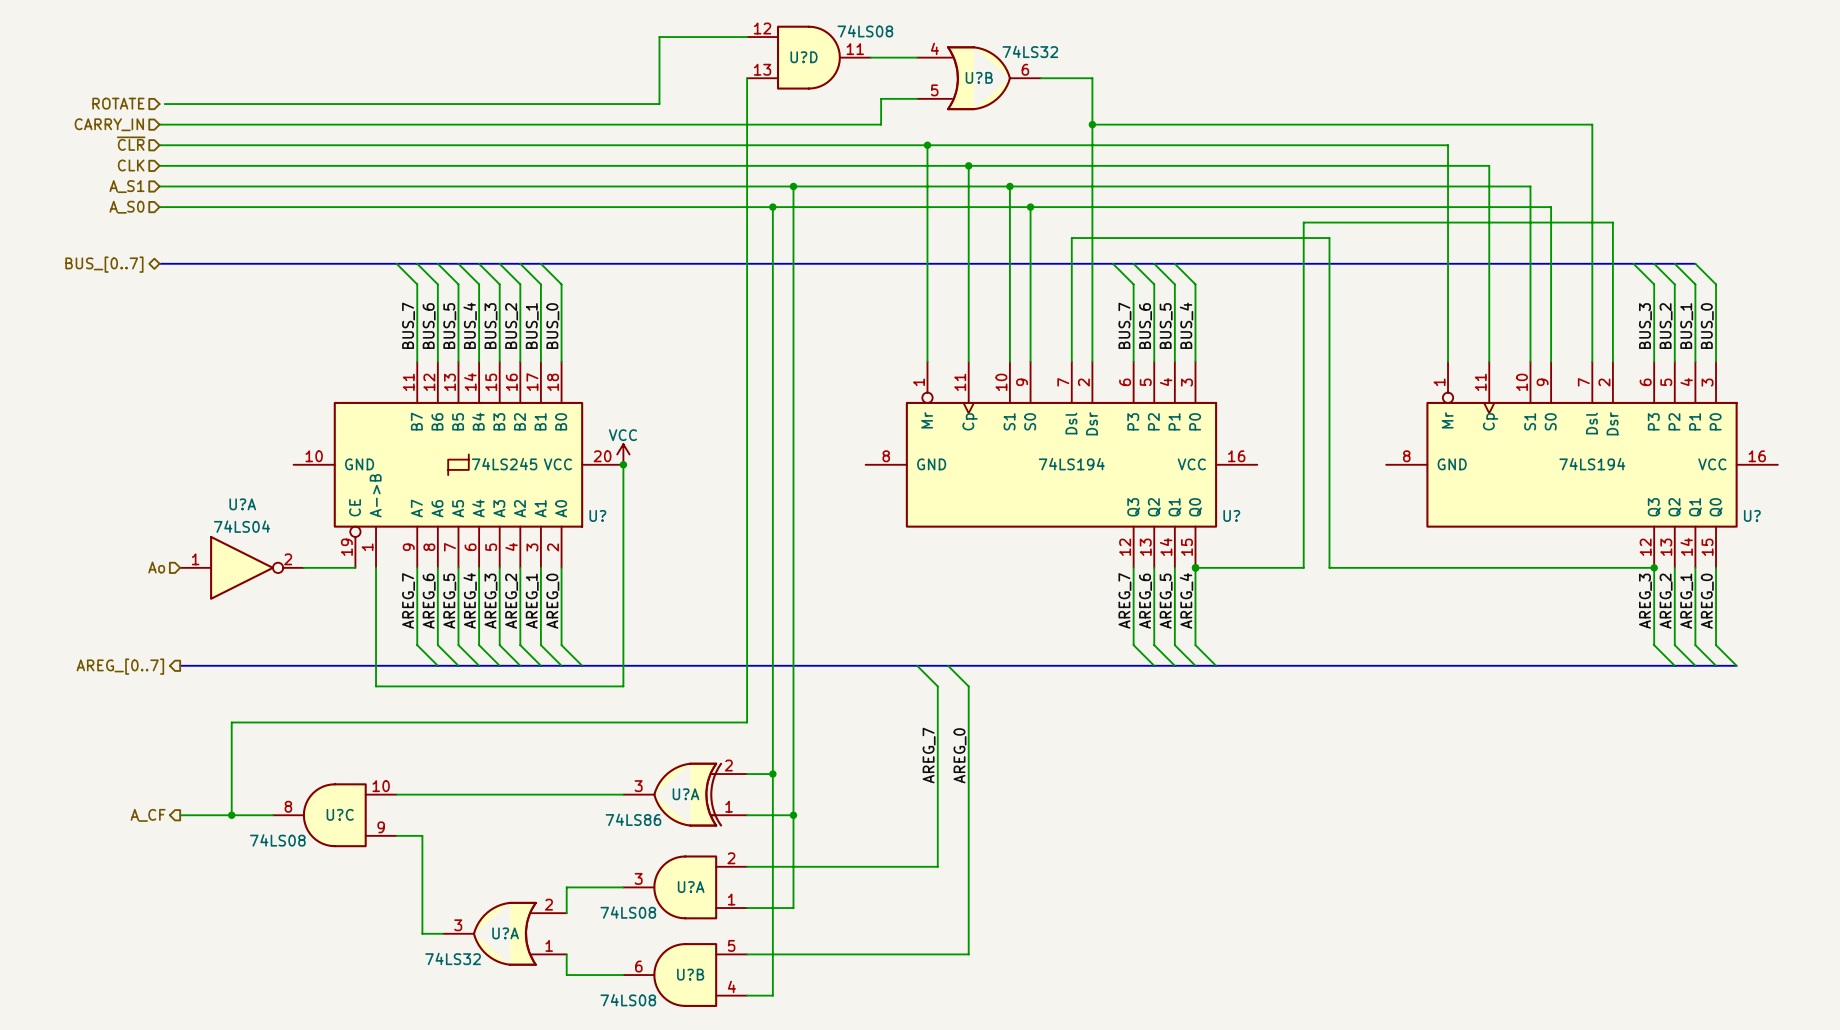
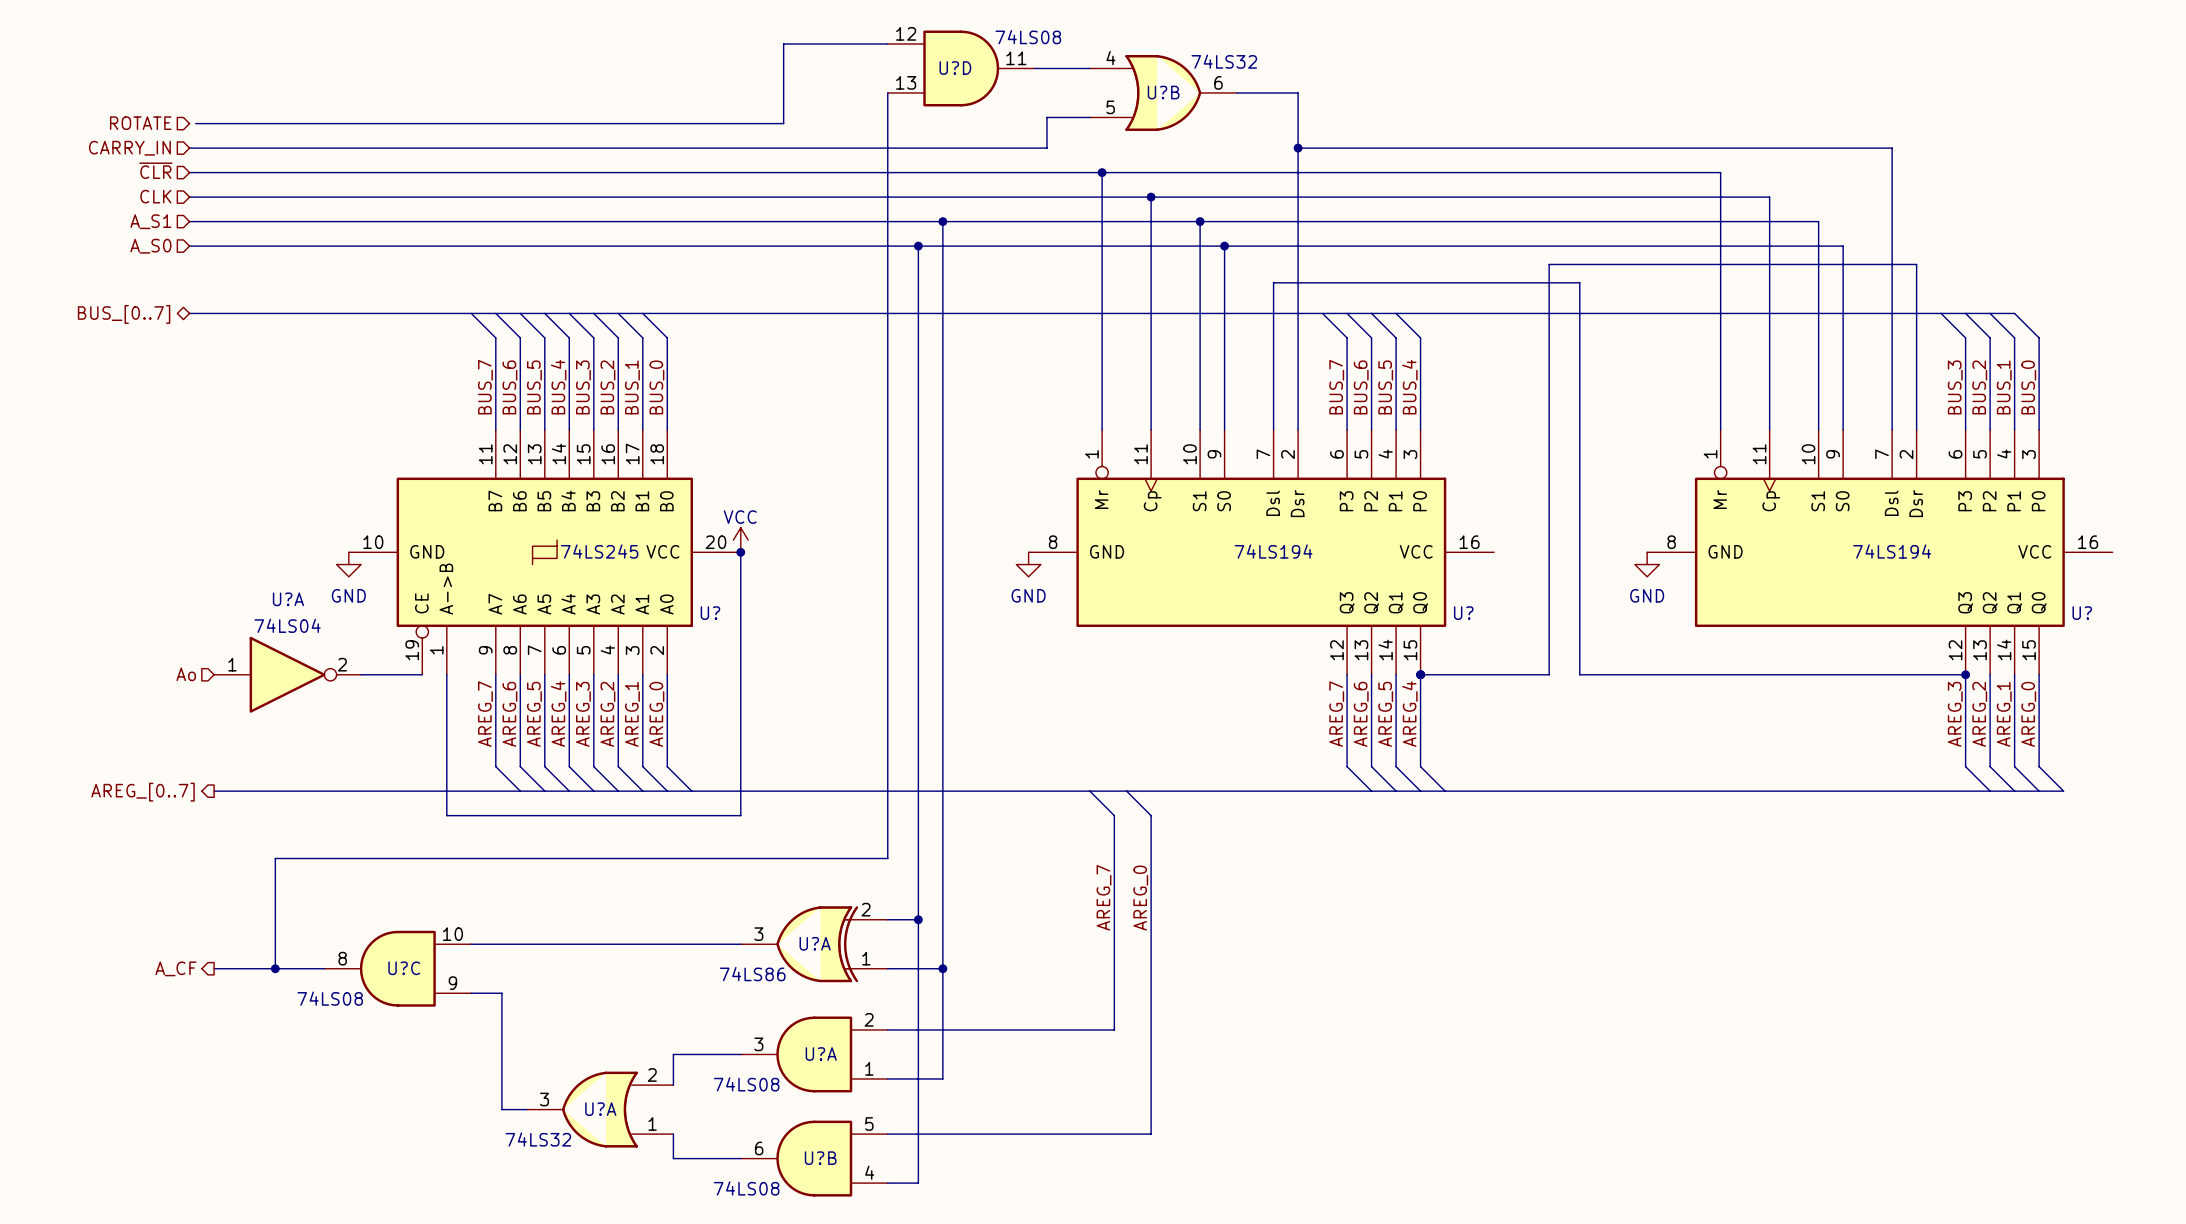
power symbol: none -> GND (348, 564)
power symbol: none -> GND (1028, 564)
power symbol: none -> GND (1647, 564)

